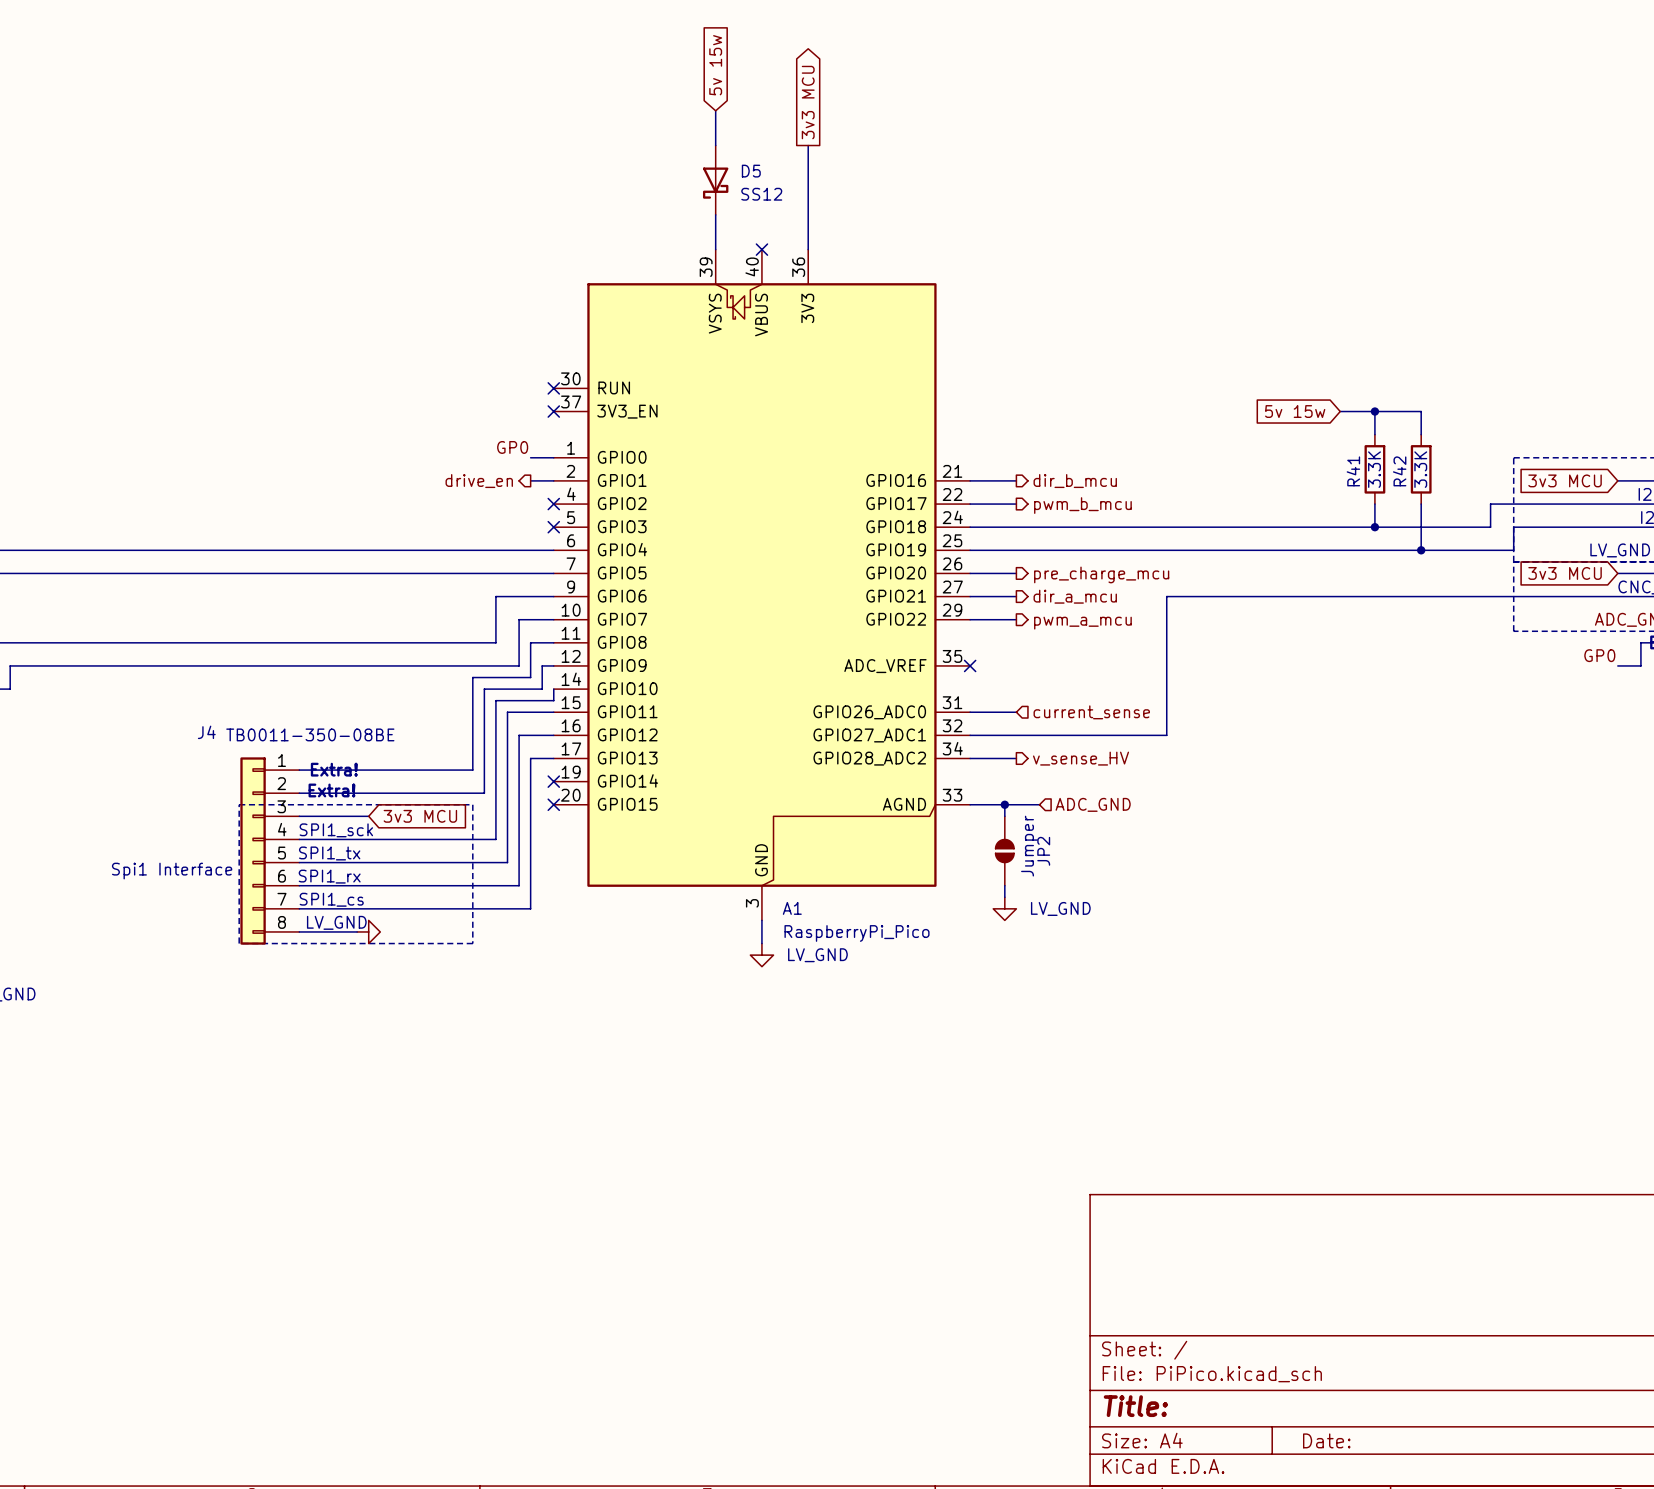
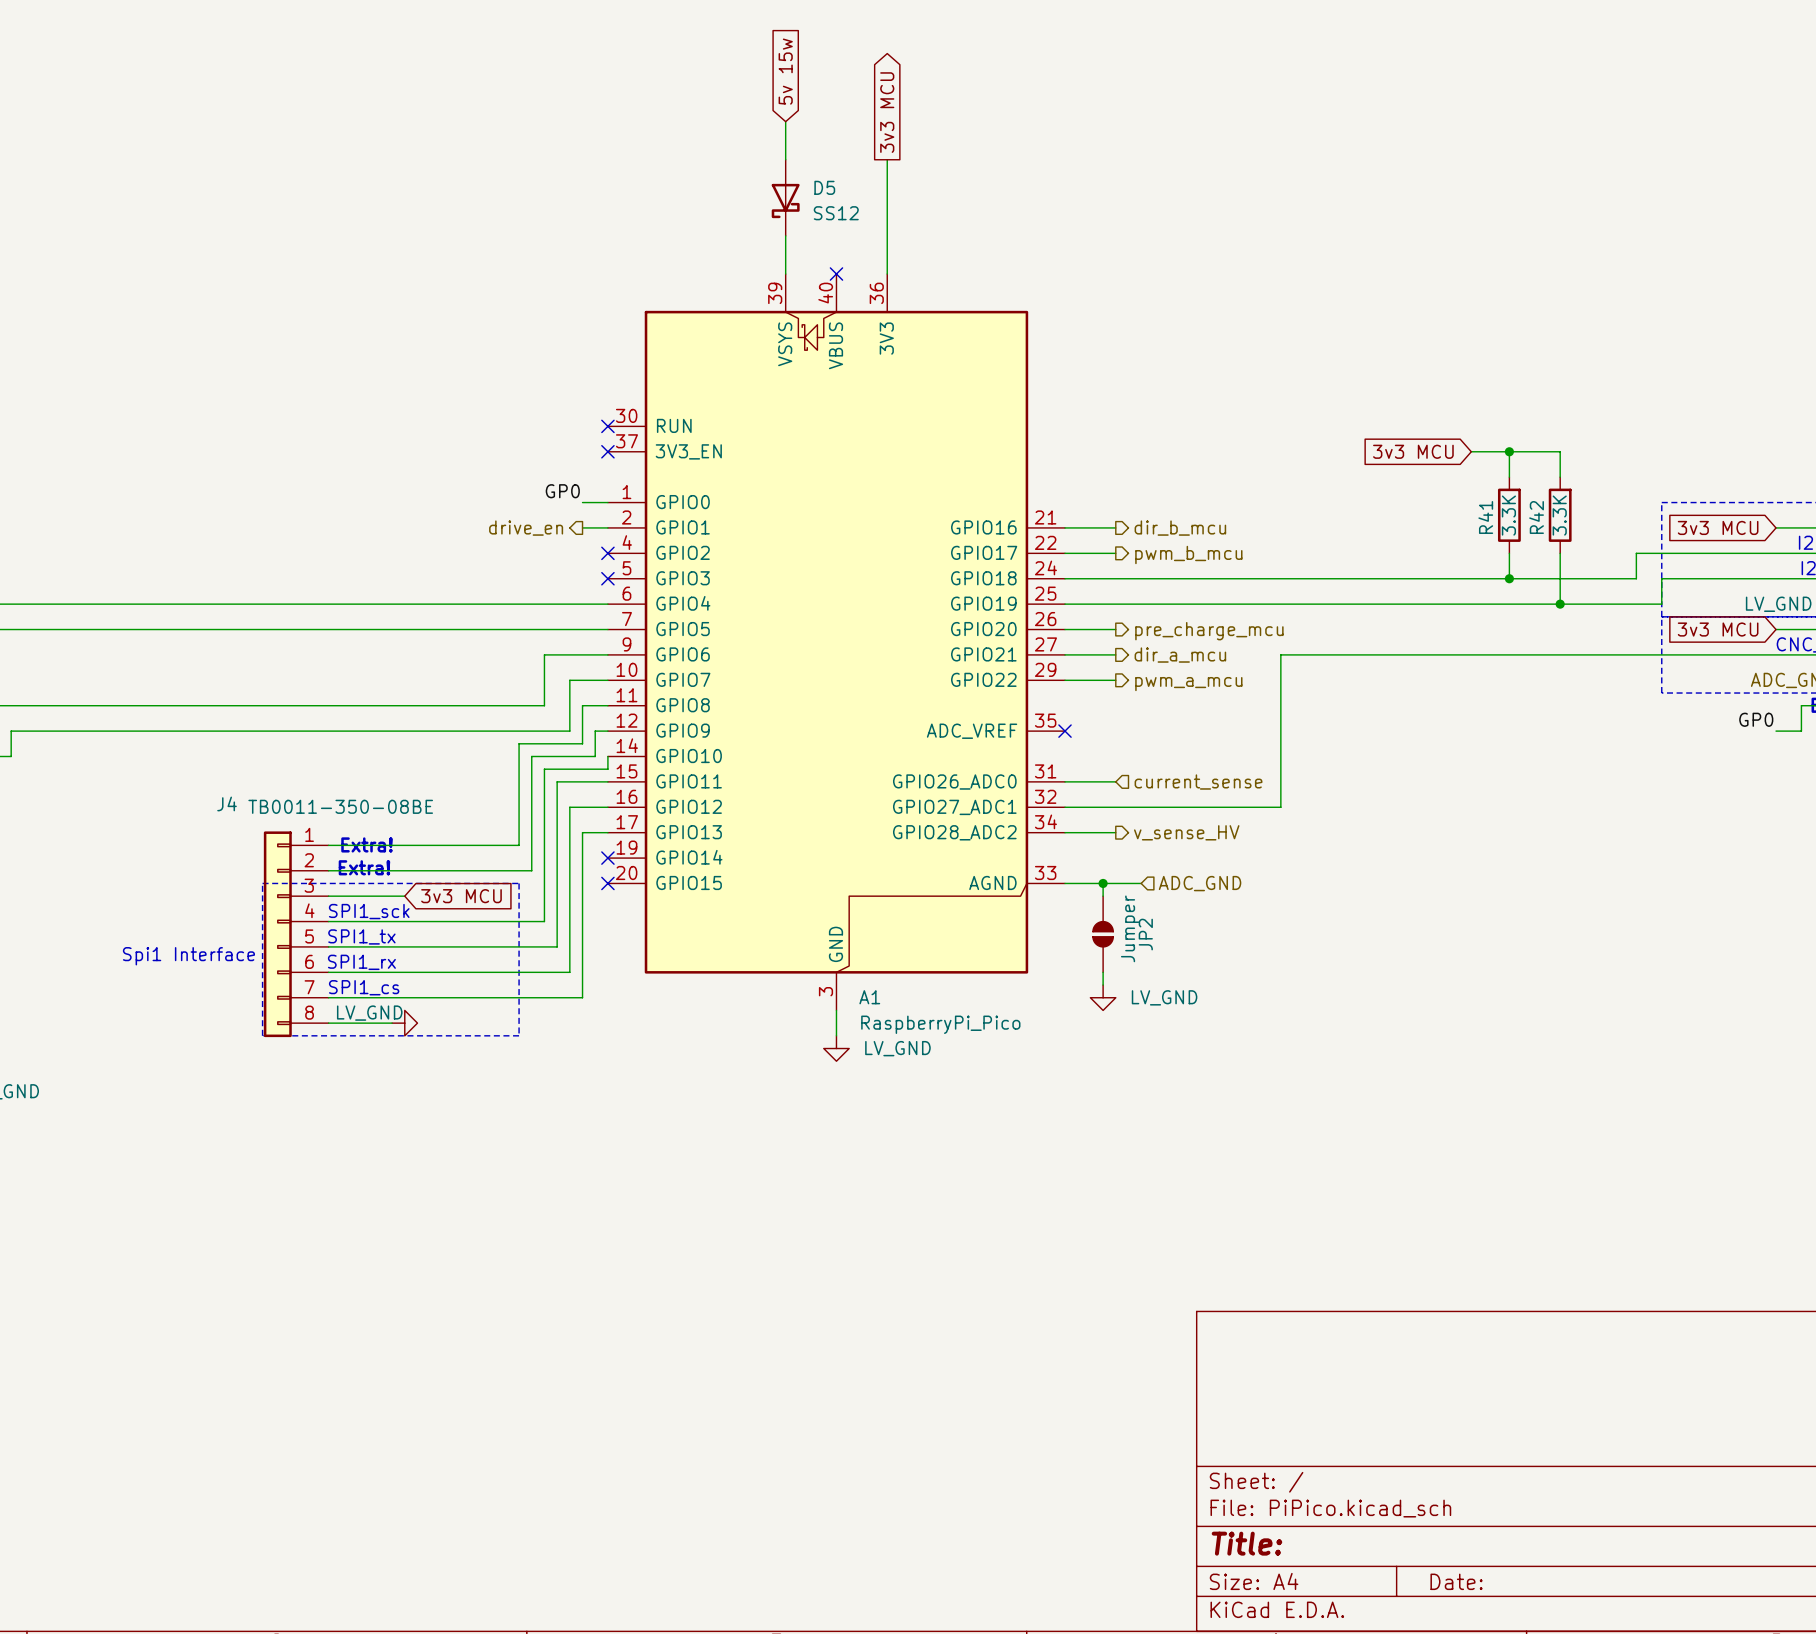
global label: 5v 15w (1295, 411) -> 3v3 MCU (1413, 451)

